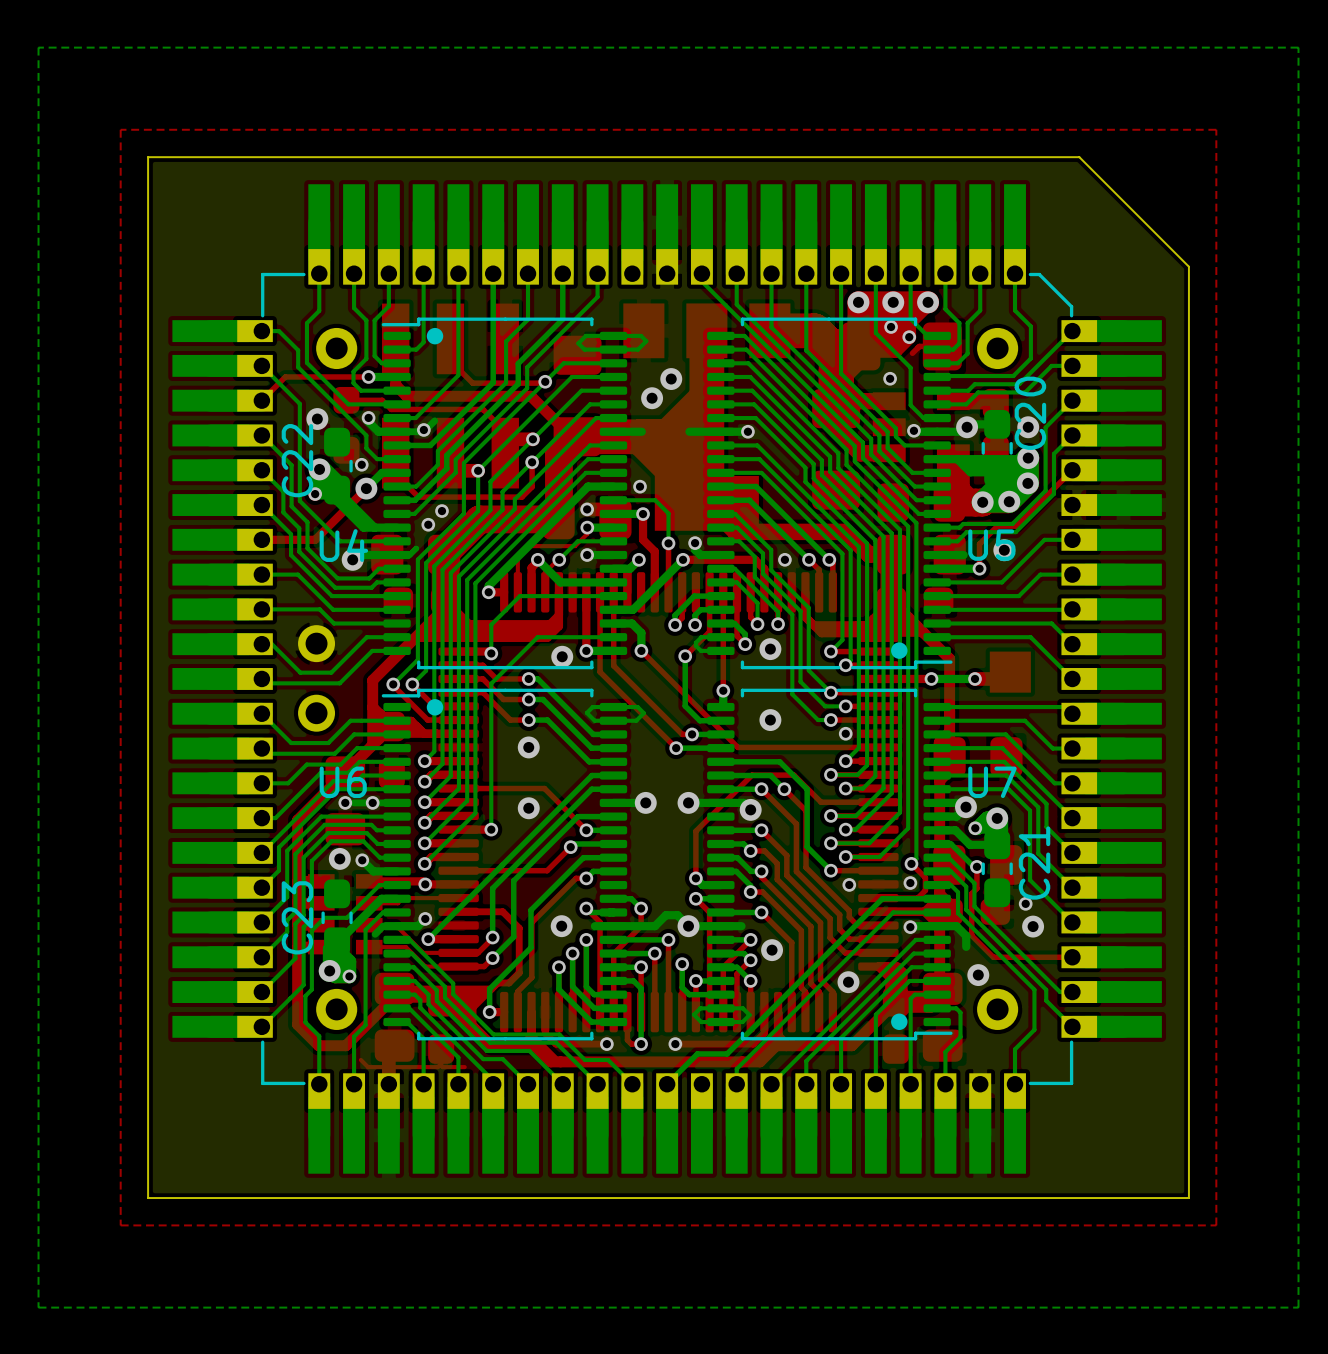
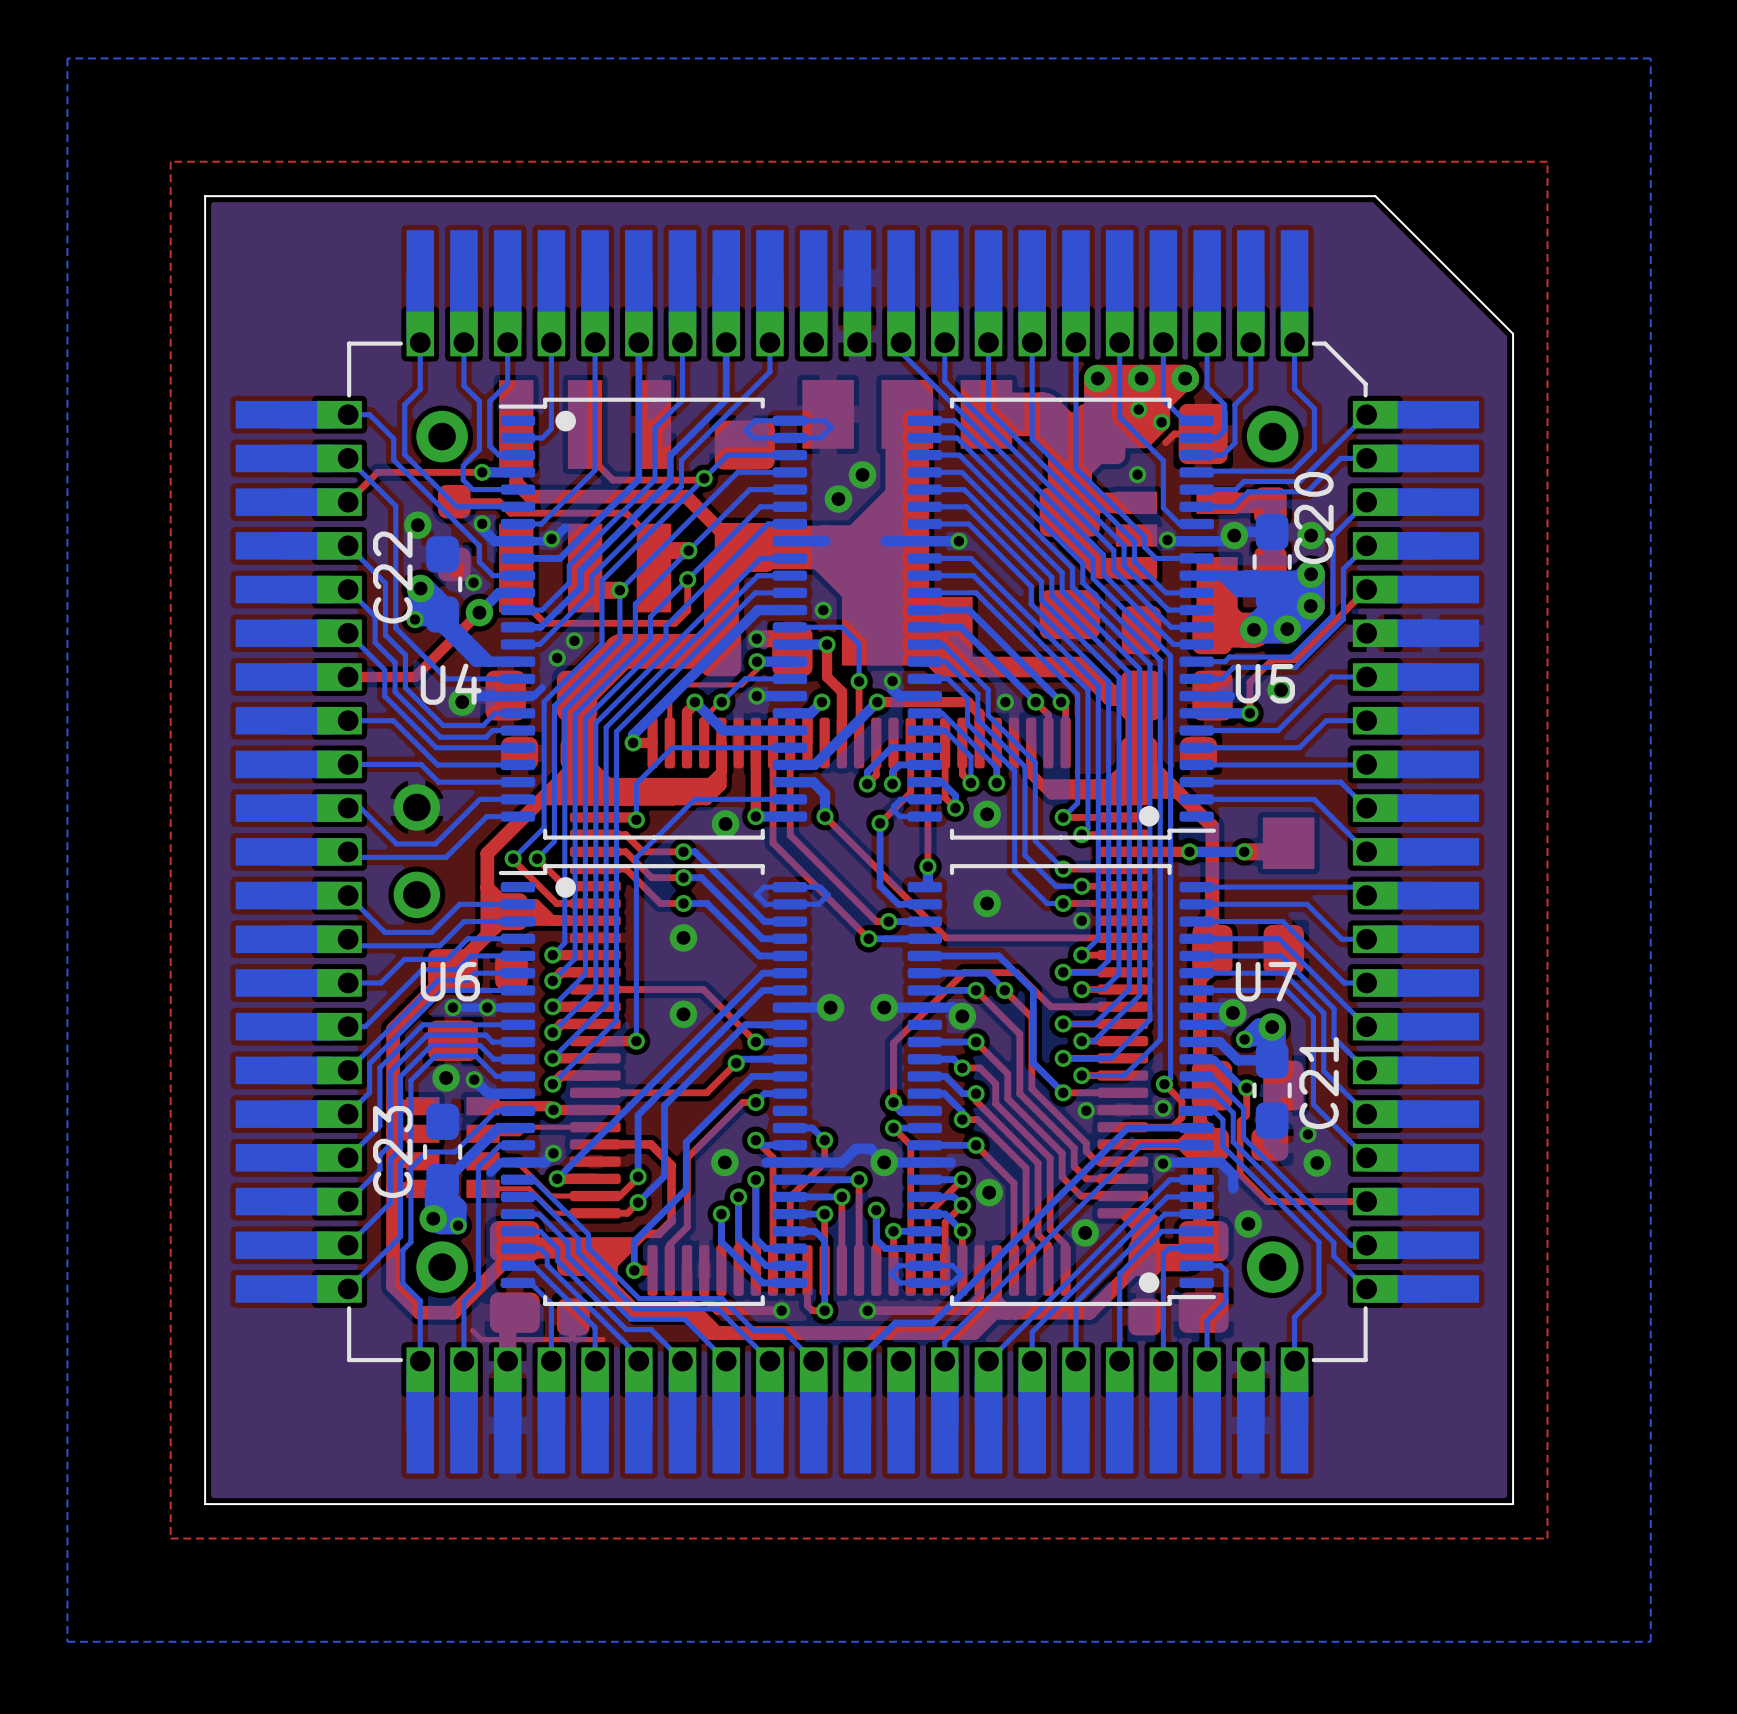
U5 footprint: [707, 317, 953, 670] -> [907, 397, 1217, 840]
U7 footprint: [707, 688, 953, 1041] -> [907, 864, 1217, 1307]

